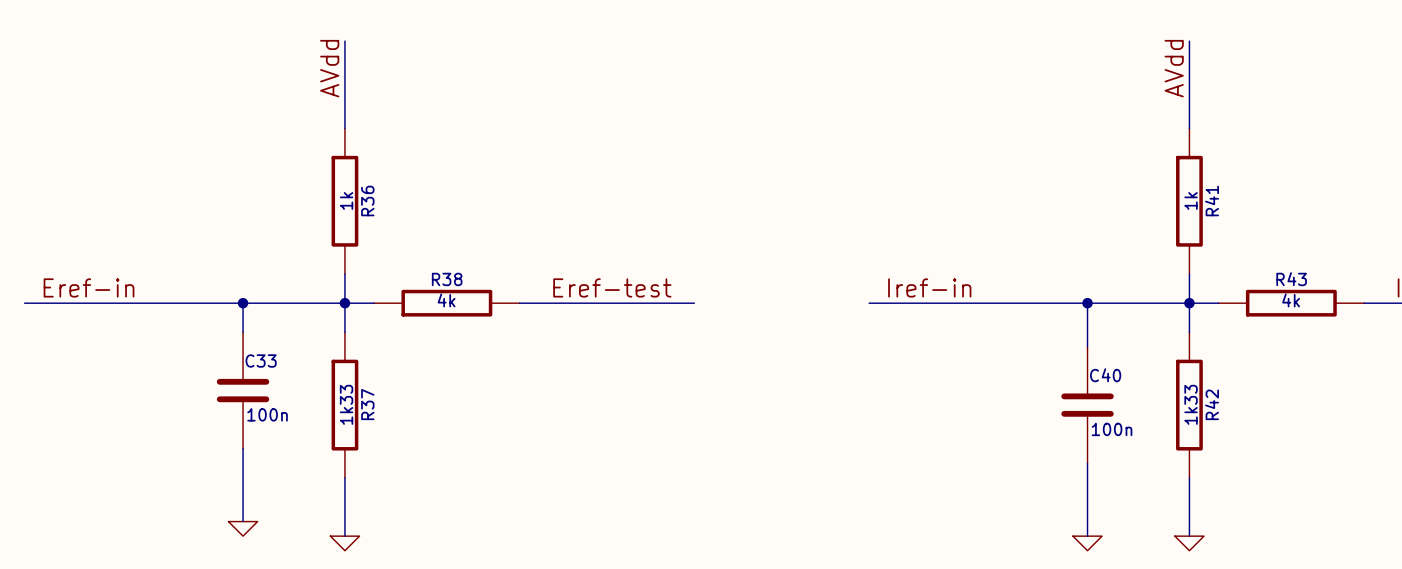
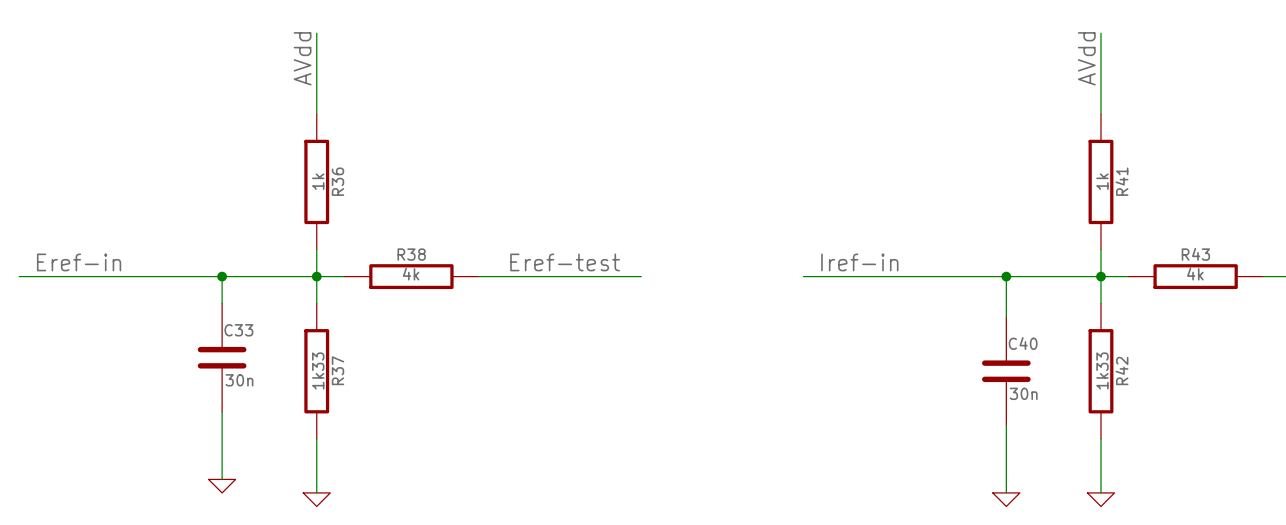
C33 value: 100n (267, 414) -> 30n (239, 380)
C40 value: 100n (1112, 429) -> 30n (1023, 393)

